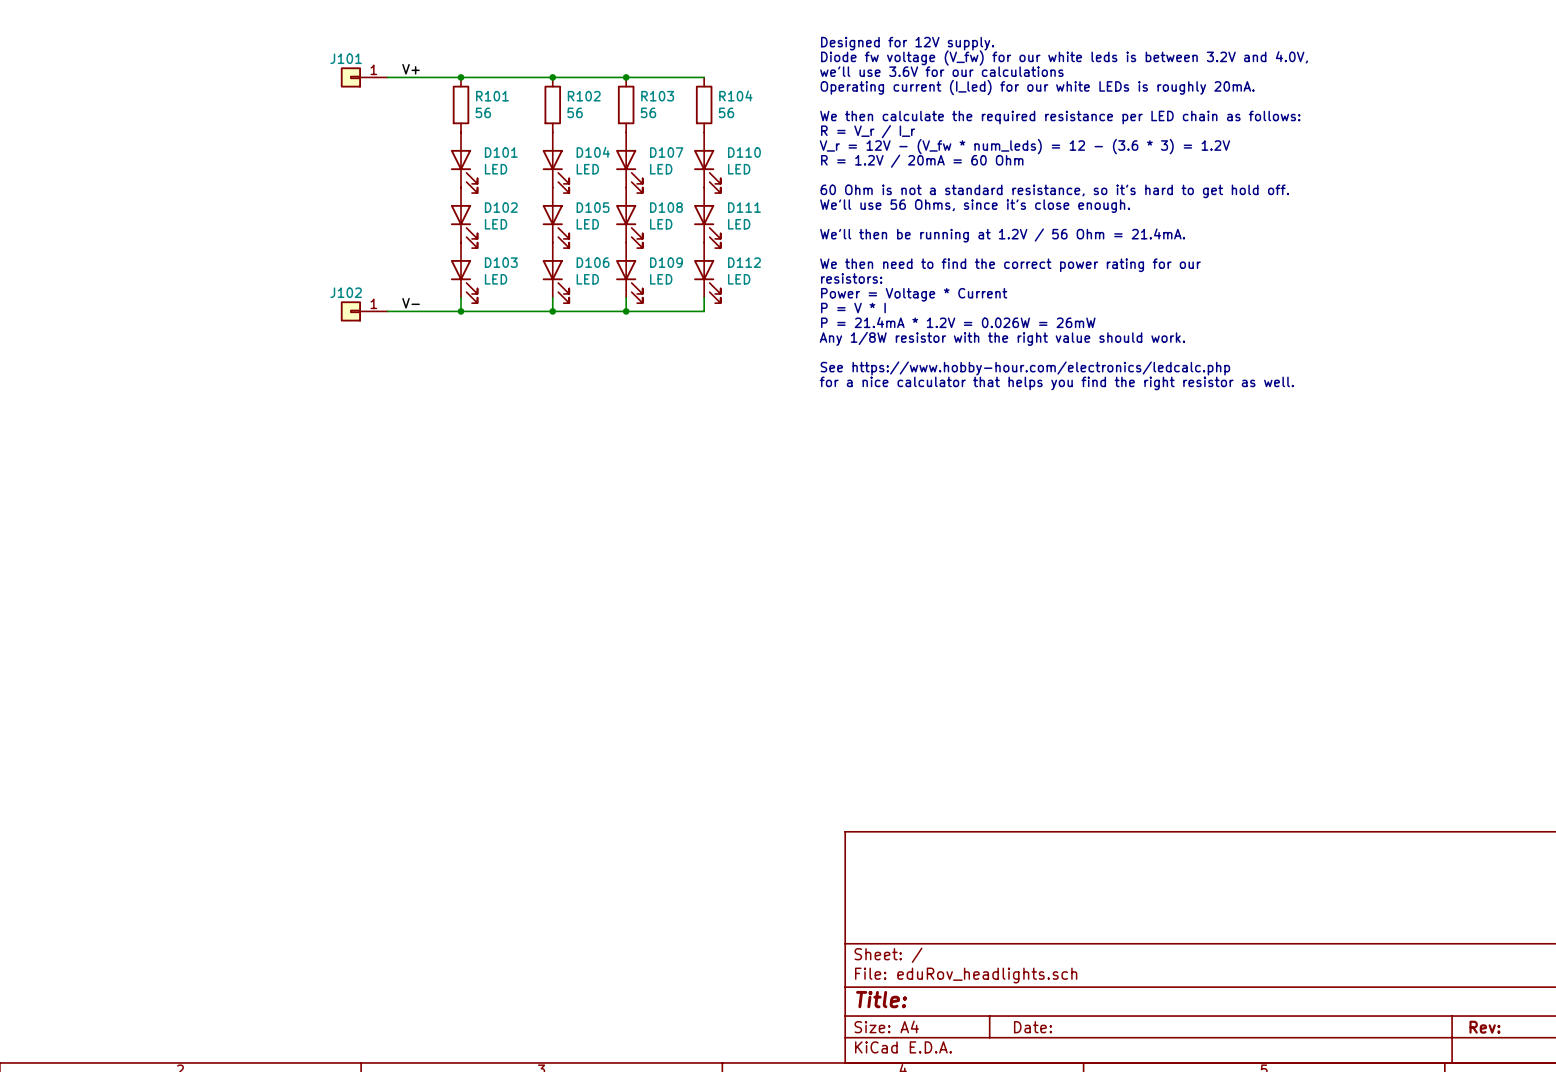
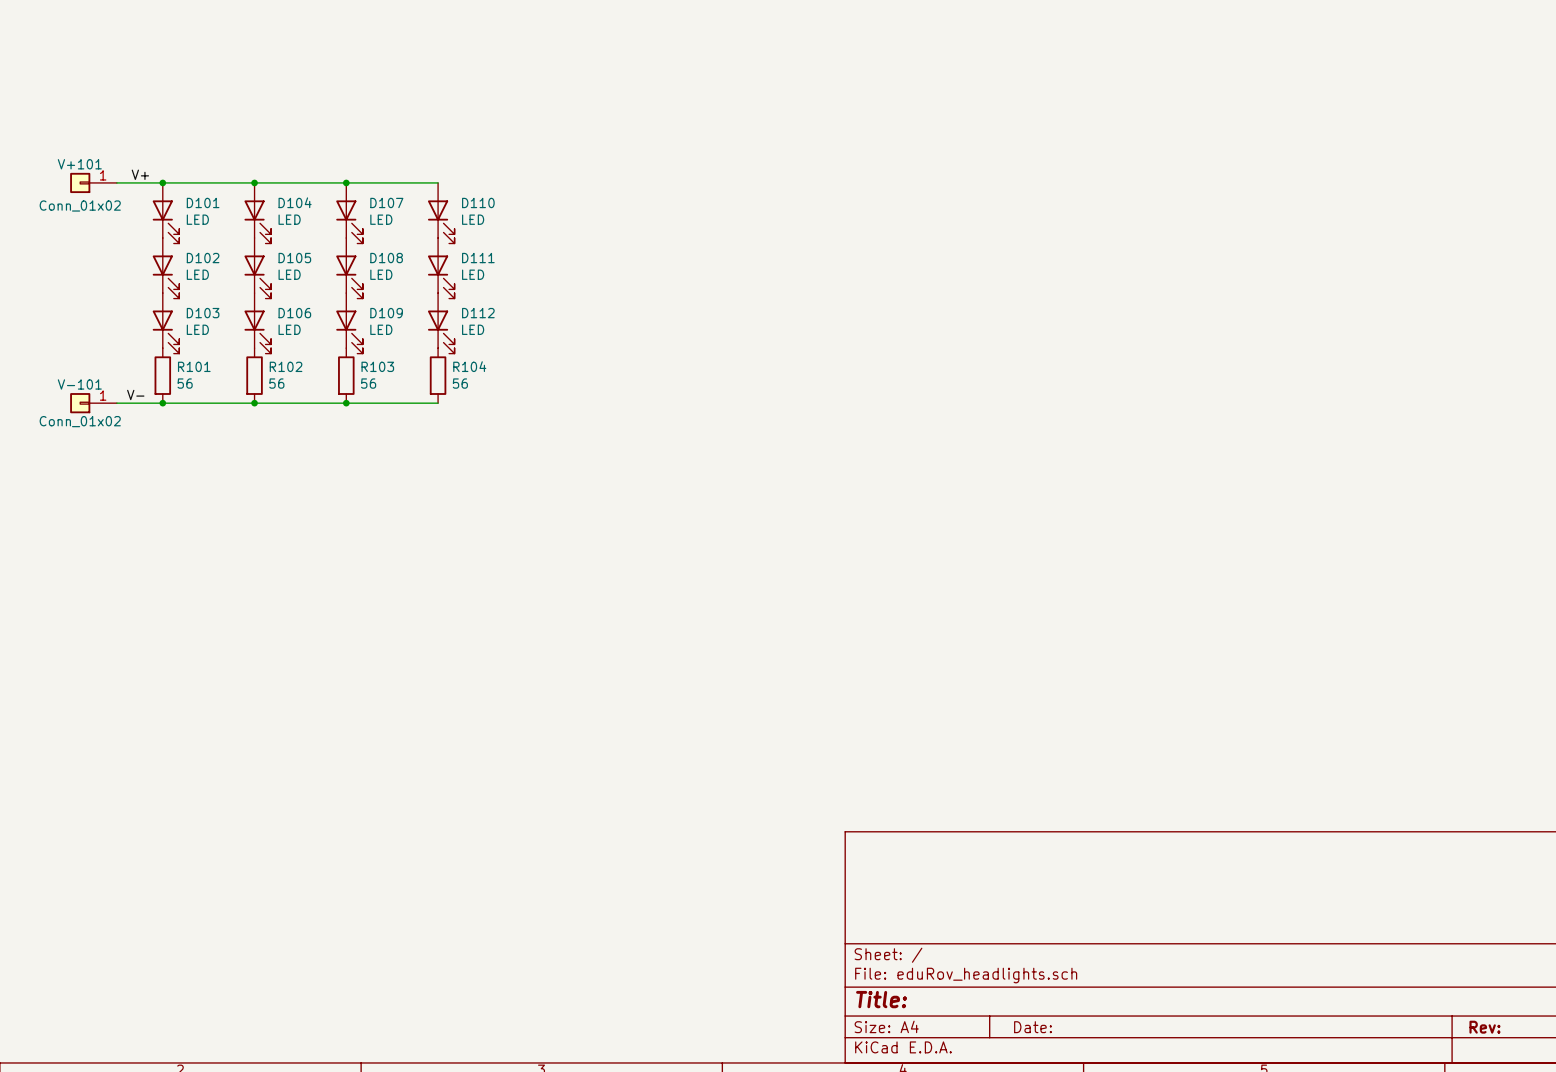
text: Designed for 12V supply. (907, 43) -> none
text: Diode fw voltage (V_fw) for our white leds is between 3.2V and 4.0V, (1064, 57) -> none
label: V+ (411, 69) -> none
text: we'll use 3.6V for our calculations (941, 71) -> none
J101: (364, 77) -> none
wire: (387, 77) (704, 77) -> none
junction: (461, 77) -> none
junction: (552, 77) -> none
junction: (626, 77) -> none
text: Operating current (I_led) for our white LEDs is roughly 20mA. (1037, 87) -> none
R101 position: (461, 104) -> (162, 375)
R102 position: (552, 104) -> (254, 375)
R103 position: (626, 104) -> (346, 375)
R104 position: (704, 104) -> (438, 375)
text: We then calculate the required resistance per LED chain as follows: (1060, 117) -> none
text: R = V_r / I_r (868, 131) -> none
text: V_r = 12V - (V_fw * num_leds) = 12 - (3.6 * 3) = 1.2V (1024, 146) -> none
text: R = 1.2V / 20mA = 60 Ohm (922, 161) -> none
D101 position: (464, 162) -> (166, 213)
D104 position: (555, 162) -> (257, 213)
D107 position: (629, 162) -> (349, 213)
D110 position: (707, 162) -> (441, 213)
label: none -> V+ (140, 174)
V+101: none -> Conn_01x02 (93, 182)
wire: none -> (116, 182) (438, 182)
junction: none -> (162, 182)
junction: none -> (254, 182)
junction: none -> (346, 182)
text: 60 Ohm is not a standard resistance, so it's hard to get hold off. (1054, 191) -> none
text: We'll use 56 Ohms, since it's close enough. (975, 206) -> none
D102 position: (464, 217) -> (166, 268)
D105 position: (555, 217) -> (257, 268)
D108 position: (629, 217) -> (349, 268)
D111 position: (707, 217) -> (441, 268)
text: We'll then be running at 1.2V / 56 Ohm = 21.4mA. (1002, 235) -> none
text: We then need to find the correct power rating for our (1010, 265) -> none
D103 position: (464, 272) -> (166, 323)
D106 position: (555, 272) -> (257, 323)
D109 position: (629, 272) -> (349, 323)
D112 position: (707, 272) -> (441, 323)
text: resistors: (851, 278) -> none
text: Power = Voltage * Current (914, 294) -> none
wire: (461, 297) (461, 311) -> none
wire: (552, 297) (552, 311) -> none
wire: (626, 297) (626, 311) -> none
wire: (704, 297) (704, 311) (387, 311) -> none
label: V- (411, 303) -> none
text: P = V * I (853, 308) -> none
J102: (364, 311) -> none
junction: (461, 311) -> none
junction: (552, 311) -> none
junction: (626, 311) -> none
text: P = 21.4mA * 1.2V = 0.026W = 26mW (958, 322) -> none
text: Any 1/8W resistor with the right value should work. (1002, 338) -> none
text: See https://www.hobby-hour.com/electronics/ledcalc.php (1025, 368) -> none
text: for a nice calculator that helps you find the right resistor as well. (1056, 383) -> none
label: none -> V- (135, 394)
V-101: none -> Conn_01x02 (93, 403)
wire: none -> (116, 403) (438, 403)
junction: none -> (162, 403)
junction: none -> (254, 403)
junction: none -> (346, 403)

